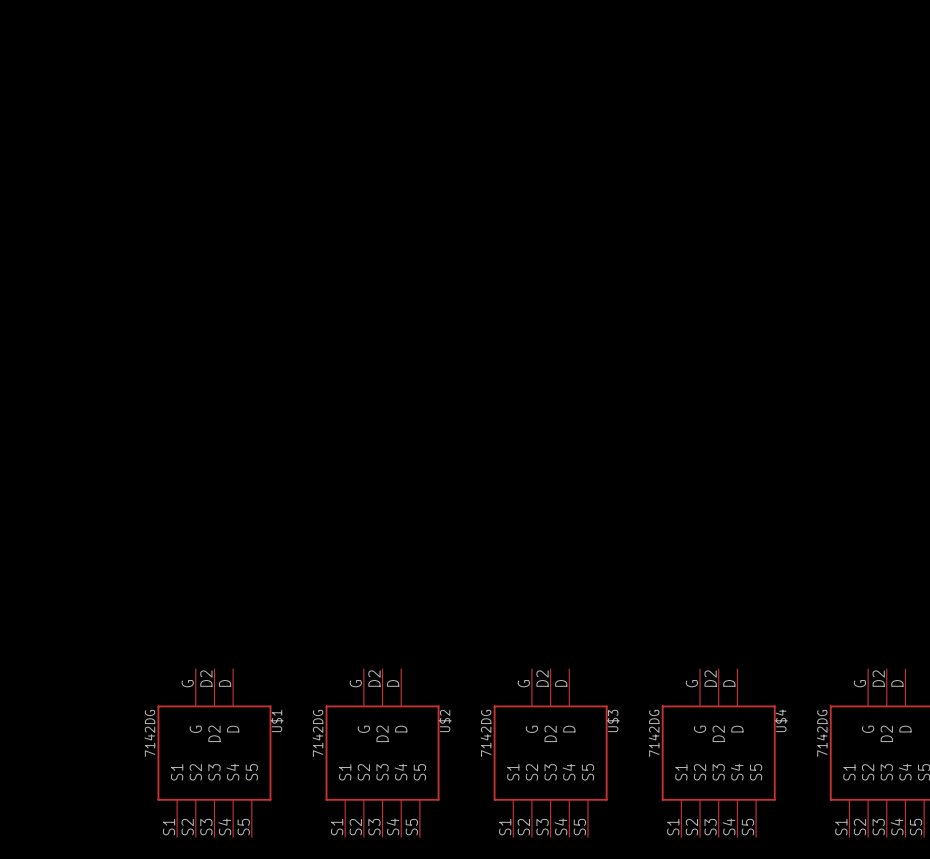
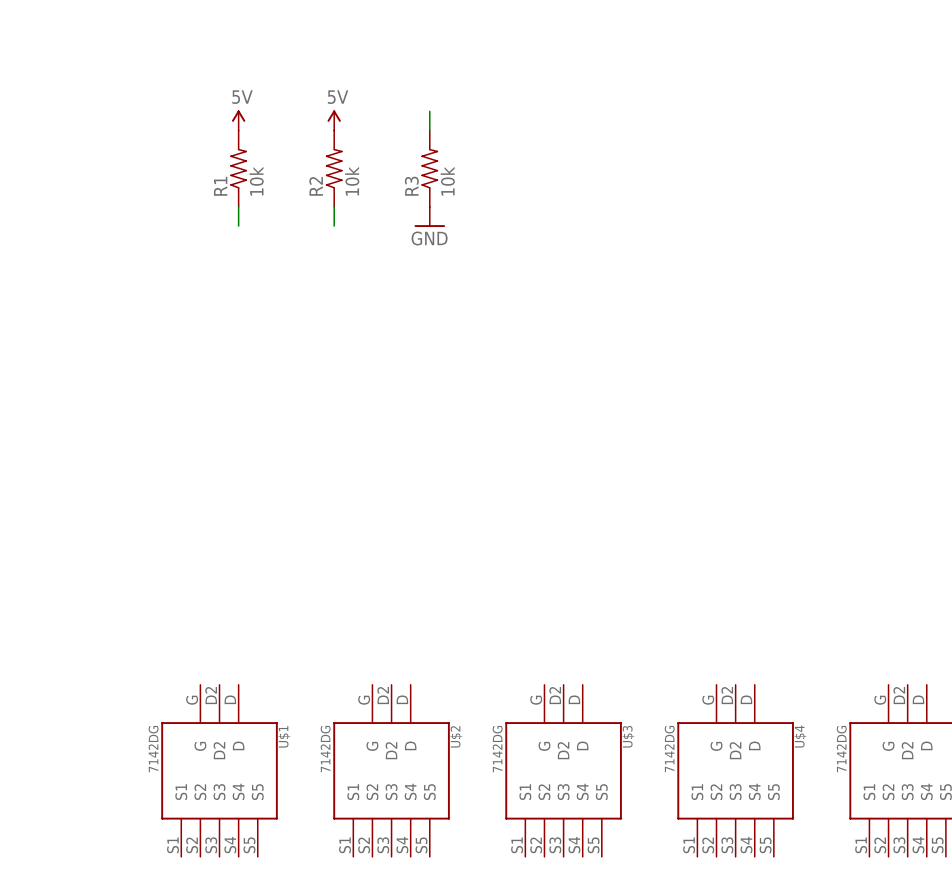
wire: none -> (429, 111) (429, 130)
power symbol: none -> 5V (238, 120)
power symbol: none -> 5V (334, 120)
R1: none -> 10k (238, 168)
R2: none -> 10k (334, 168)
R3: none -> 10k (429, 168)
wire: none -> (238, 206) (238, 226)
wire: none -> (334, 206) (334, 226)
power symbol: none -> GND (429, 216)

